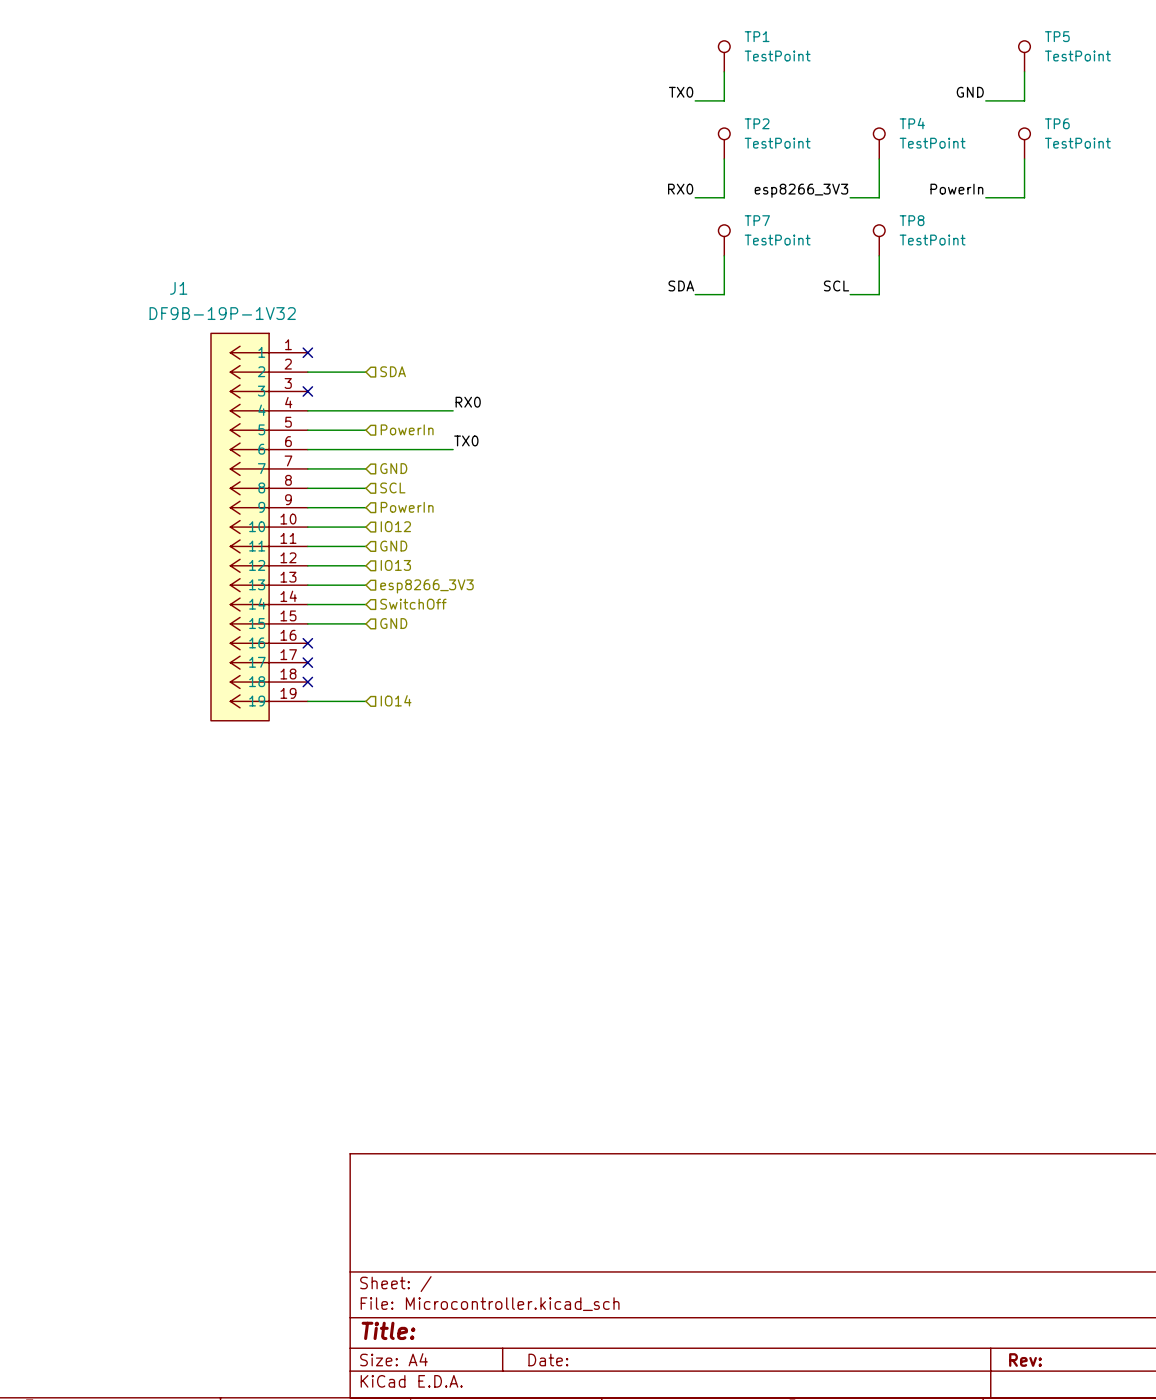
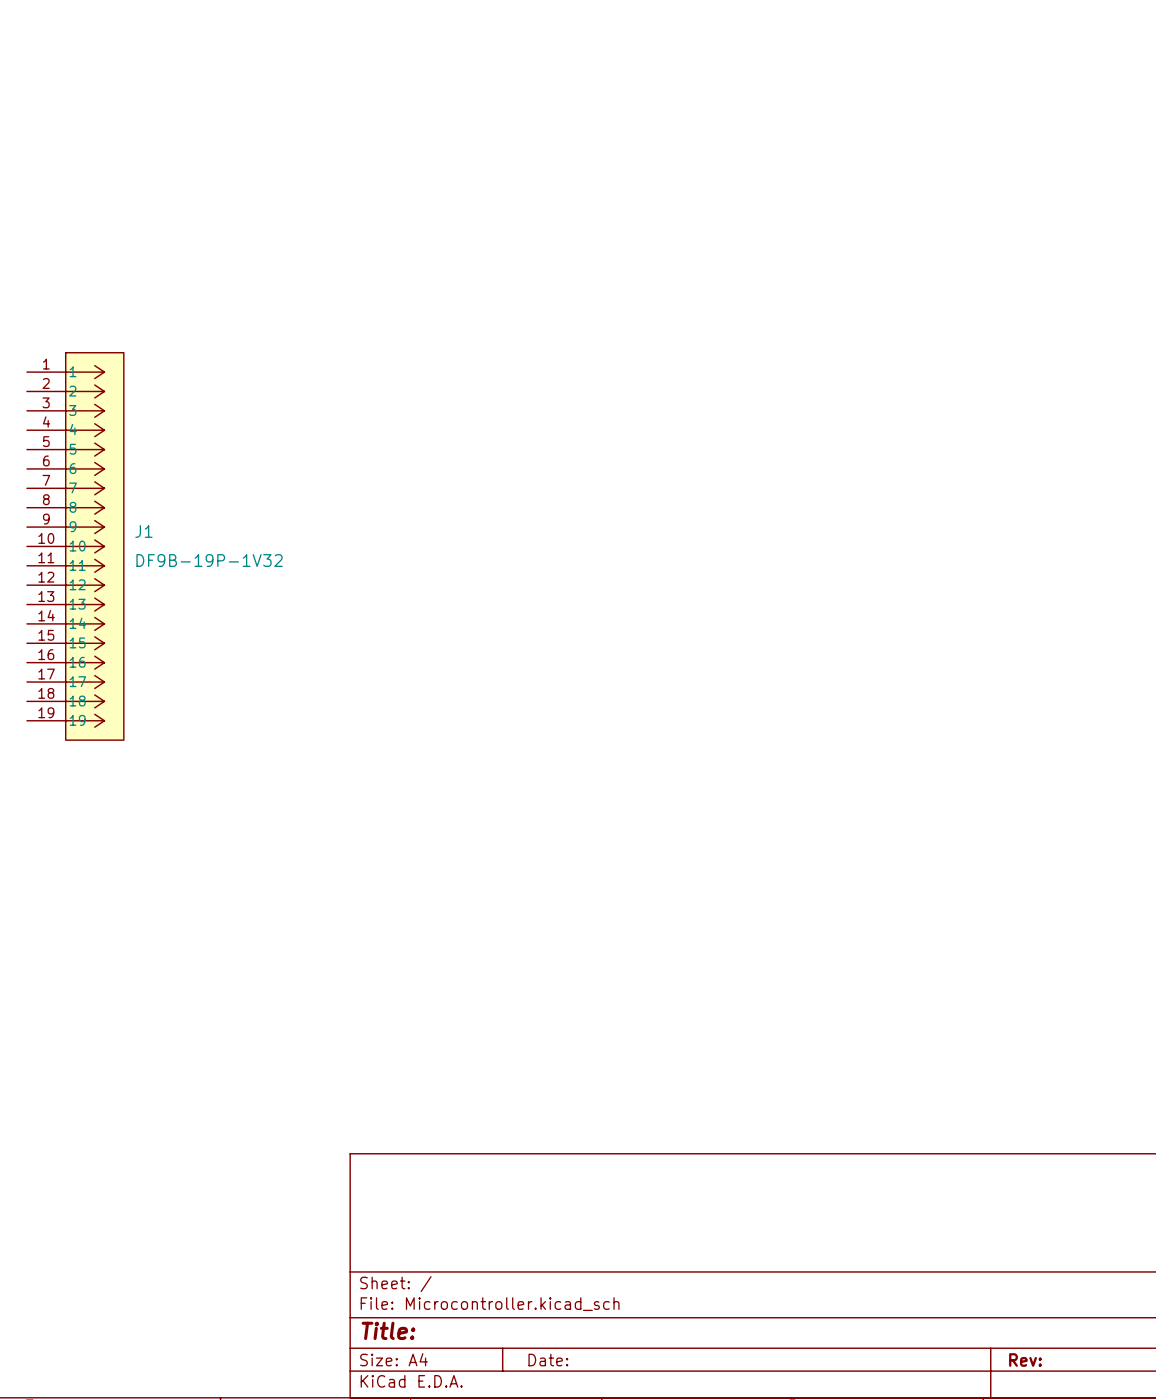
TP1: TestPoint (724, 56) -> none
TP5: TestPoint (1024, 56) -> none
wire: (724, 71) (724, 100) (695, 100) -> none
wire: (1024, 71) (1024, 100) (985, 100) -> none
label: TX0 (681, 92) -> none
label: GND (970, 92) -> none
TP2: TestPoint (724, 143) -> none
TP4: TestPoint (879, 143) -> none
TP6: TestPoint (1024, 143) -> none
wire: (724, 159) (724, 197) (695, 197) -> none
wire: (879, 159) (879, 197) (850, 197) -> none
wire: (1024, 159) (1024, 197) (985, 197) -> none
label: RX0 (680, 189) -> none
label: PowerIn (956, 189) -> none
label: esp8266_3V3 (801, 190) -> none
TP7: TestPoint (724, 240) -> none
TP8: TestPoint (879, 240) -> none
wire: (724, 255) (724, 294) (695, 294) -> none
wire: (879, 255) (879, 294) (850, 294) -> none
label: SDA (681, 285) -> none
label: SCL (836, 285) -> none
J1 name position: J1 (178, 288) -> J1 (143, 531)
J1 value position: DF9B-19P-1V32 (222, 313) -> DF9B-19P-1V32 (209, 560)
no-connect mark: (307, 352) -> none
hierarchical label: SDA (393, 371) -> none
wire: (307, 372) (365, 372) -> none
no-connect mark: (307, 391) -> none
label: RX0 (468, 402) -> none
wire: (307, 410) (453, 410) -> none
hierarchical label: PowerIn (407, 429) -> none
wire: (307, 430) (365, 430) -> none
label: TX0 (466, 440) -> none
wire: (307, 449) (453, 449) -> none
wire: (307, 468) (365, 468) -> none
hierarchical label: GND (393, 468) -> none
hierarchical label: SCL (392, 487) -> none
wire: (307, 488) (365, 488) -> none
wire: (307, 507) (365, 507) -> none
hierarchical label: PowerIn (407, 507) -> none
hierarchical label: IO12 (395, 526) -> none
J1 flip: as is (240, 527) -> left-right (94, 546)
wire: (307, 527) (365, 527) -> none
wire: (307, 546) (365, 546) -> none
hierarchical label: GND (393, 546) -> none
wire: (307, 565) (365, 565) -> none
hierarchical label: IO13 (395, 565) -> none
wire: (307, 585) (365, 585) -> none
hierarchical label: esp8266_3V3 (426, 586) -> none
wire: (307, 604) (365, 604) -> none
hierarchical label: SwitchOff (413, 604) -> none
wire: (307, 623) (365, 623) -> none
hierarchical label: GND (393, 623) -> none
no-connect mark: (307, 643) -> none
no-connect mark: (307, 662) -> none
no-connect mark: (307, 682) -> none
hierarchical label: IO14 (396, 700) -> none
wire: (307, 701) (365, 701) -> none

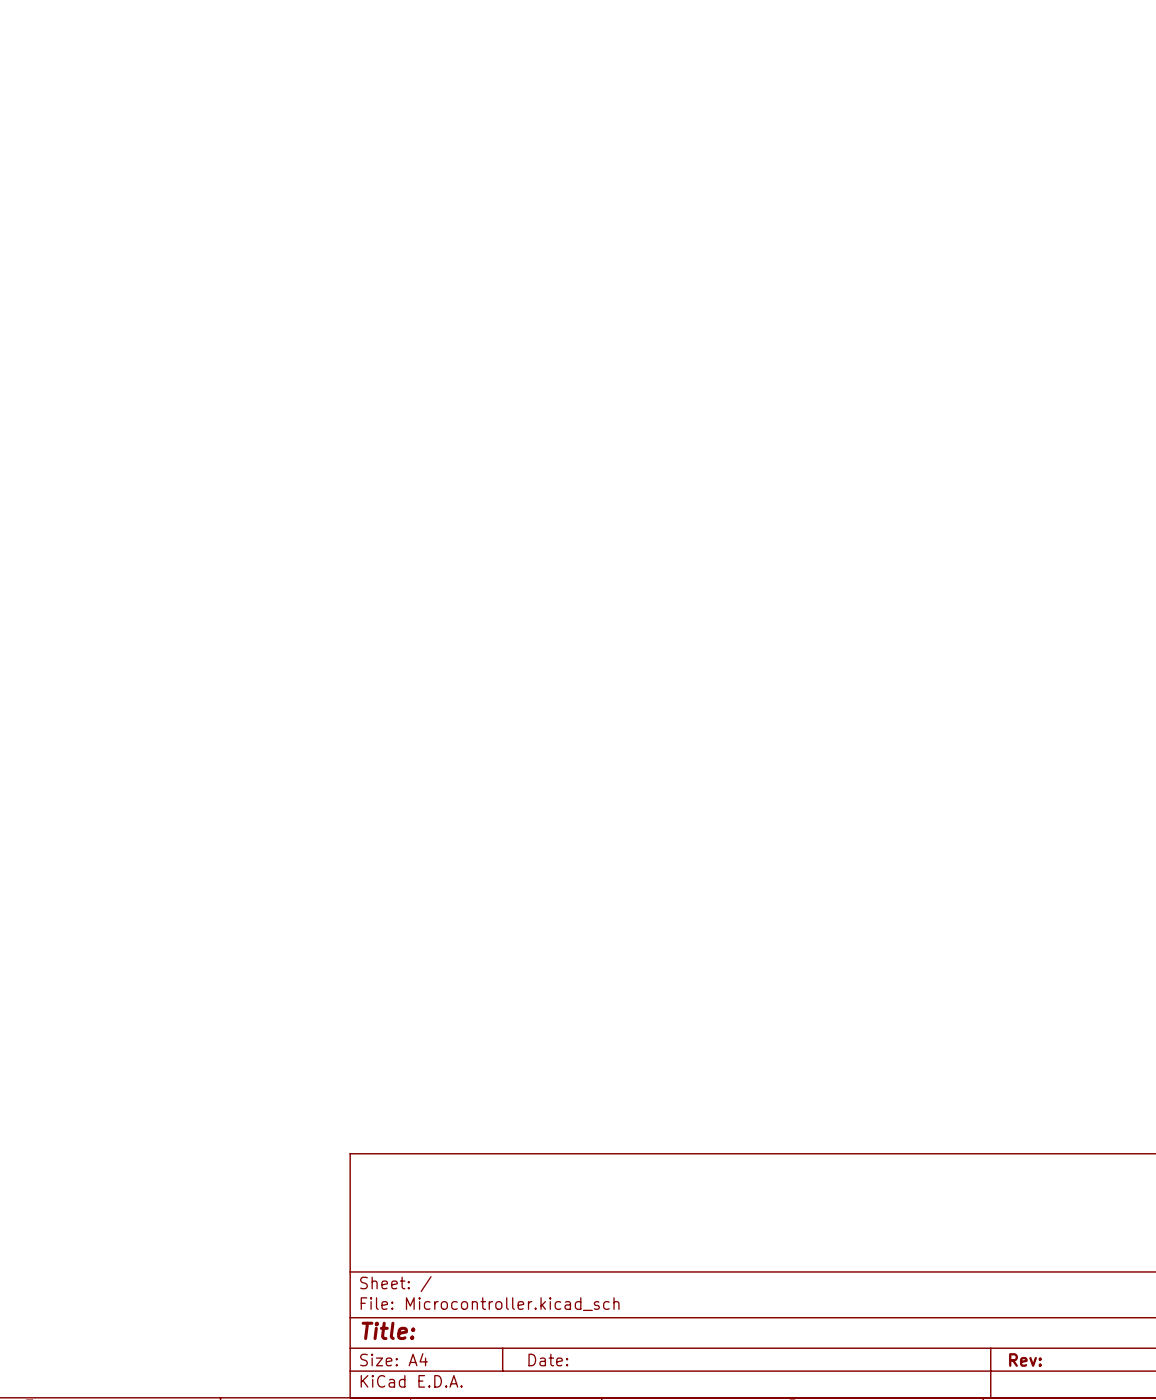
J1: DF9B-19P-1V32 (75, 546) -> none

